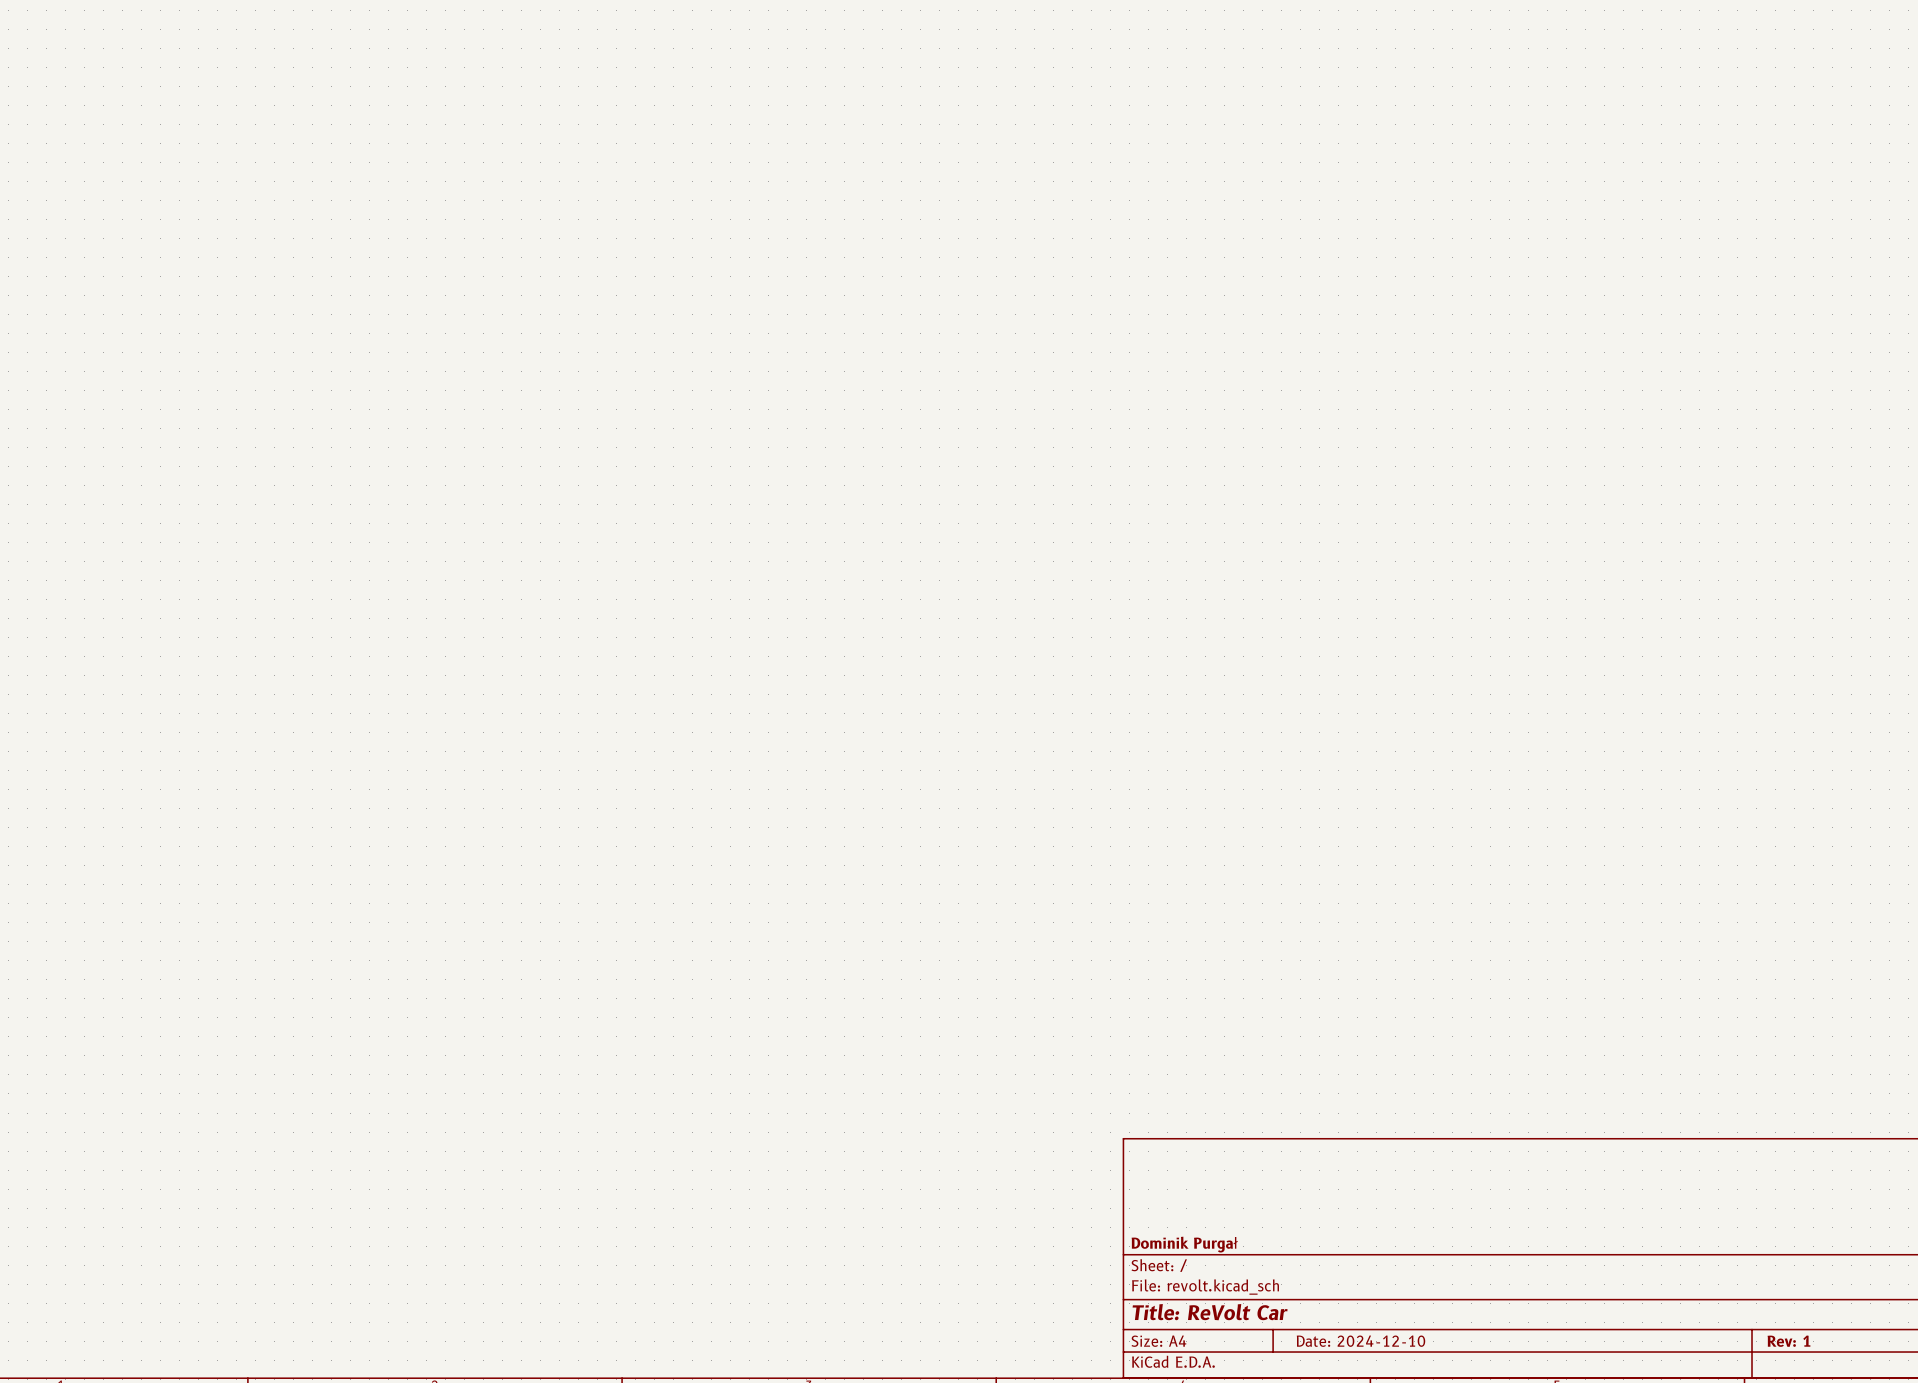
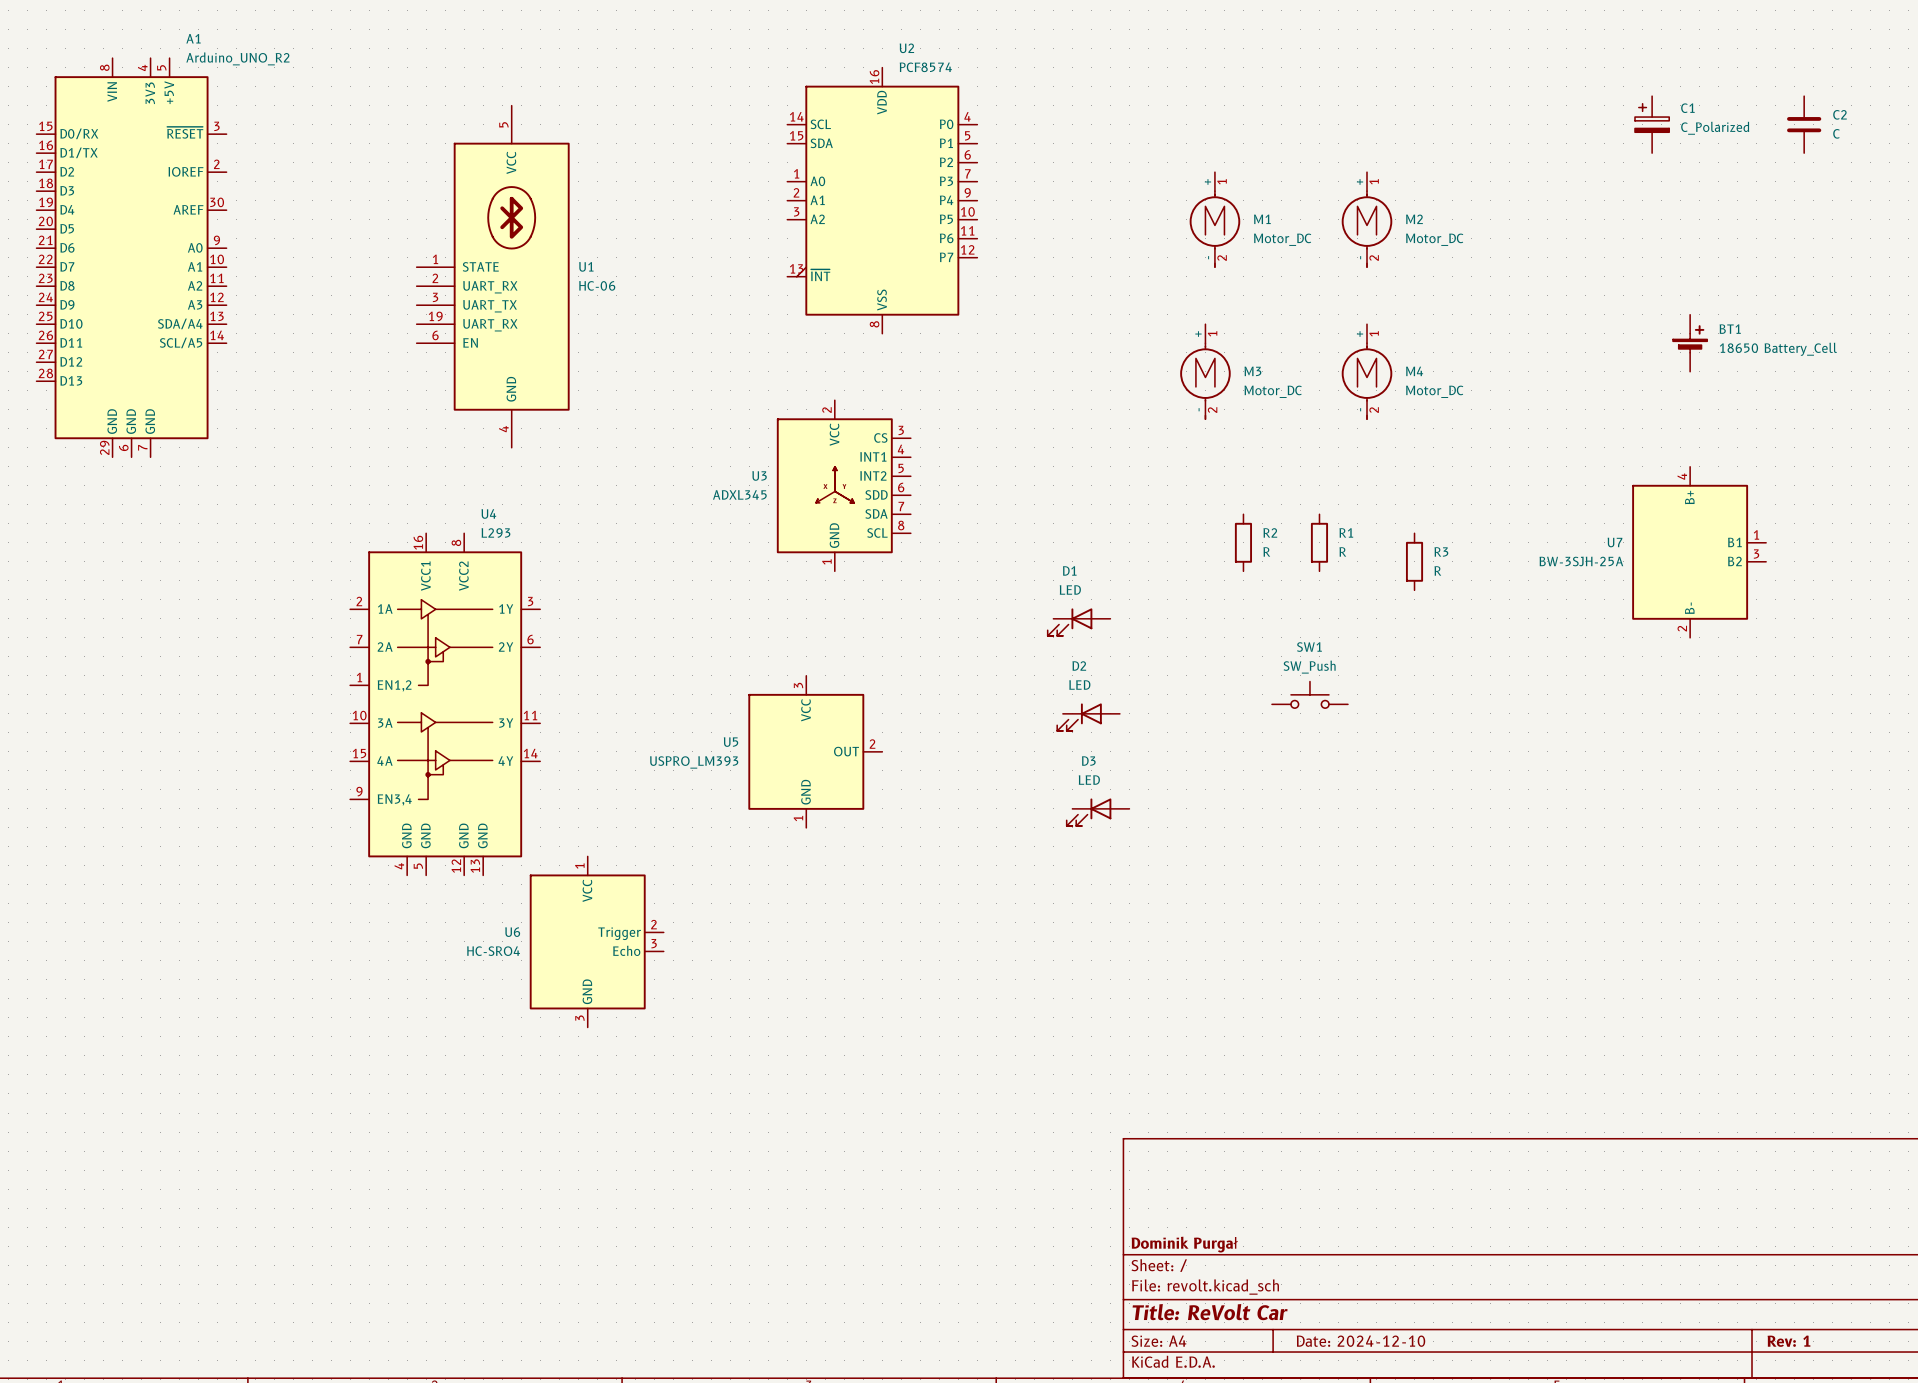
C1: none -> C_Polarized (1652, 124)
C2: none -> C (1804, 124)
U2: none -> PCF8574 (882, 200)
M1: none -> Motor_DC (1214, 219)
M2: none -> Motor_DC (1367, 219)
A1: none -> Arduino_UNO_R2 (131, 257)
U1: none -> HC-06 (493, 276)
BT1: none -> 18650 Battery_Cell (1690, 343)
M3: none -> Motor_DC (1205, 371)
M4: none -> Motor_DC (1367, 371)
U3: none -> ADXL345 (843, 485)
R2: none -> R (1243, 542)
R1: none -> R (1319, 542)
U7: none -> BW-3SJH-25A (1699, 552)
R3: none -> R (1414, 561)
D1: none -> LED (1079, 622)
SW1: none -> SW_Push (1309, 694)
U4: none -> L293 (445, 704)
D2: none -> LED (1088, 717)
U5: none -> USPRO_LM393 (815, 751)
D3: none -> LED (1098, 812)
U6: none -> HC-SRO4 (596, 941)

